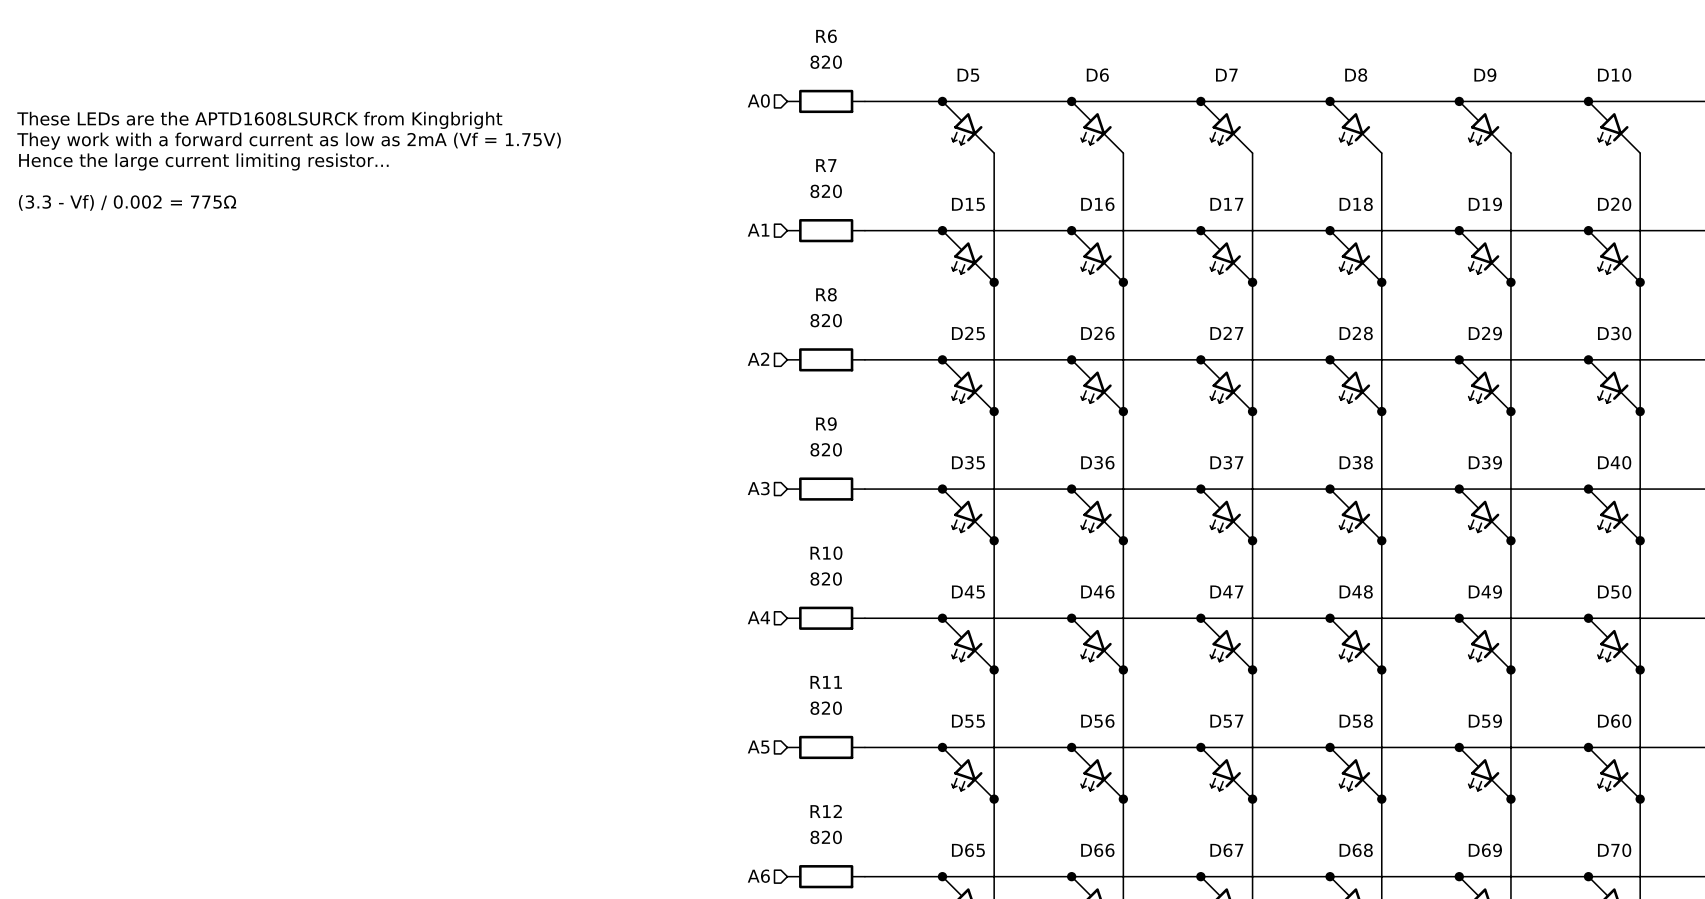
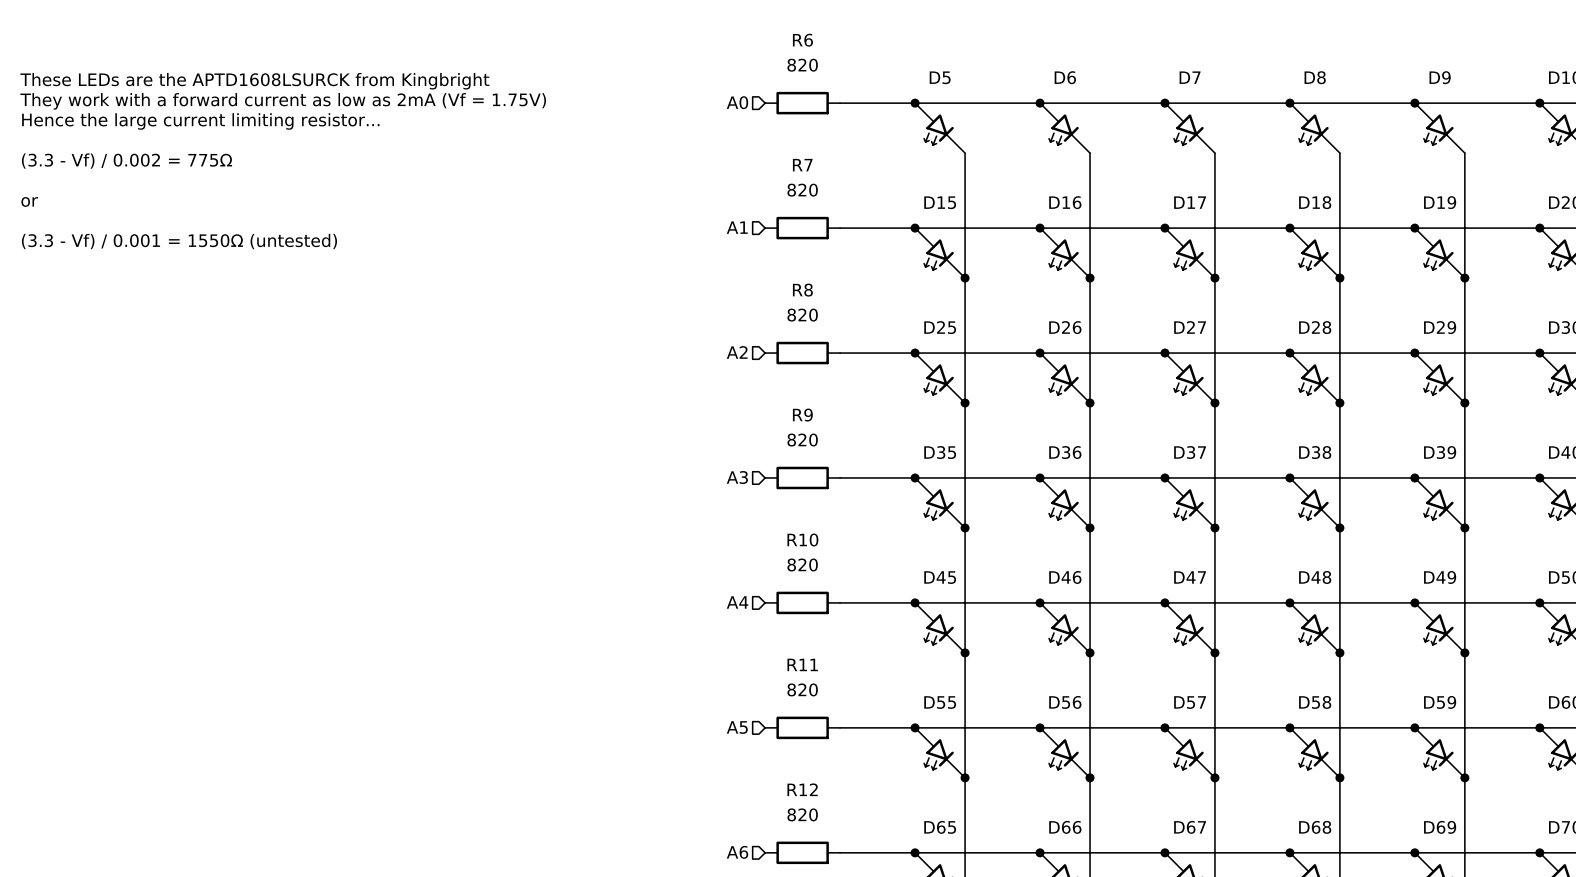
text: none -> These LEDs are the APTD1608LSURCK from Kingbright (254, 81)
text: These LEDs are the APTD1608LSURCK from Kingbright (259, 120) -> Hence the large current limiting resistor... (200, 121)
text position: They work with a forward current as low as 2mA (Vf = 1.75V) (289, 141) -> They work with a forward current as low as 2mA (Vf = 1.75V) (283, 101)
text: Hence the large current limiting resistor... (203, 162) -> (3.3 - Vf) / 0.002 = 775Ω (126, 161)
text: (3.3 - Vf) / 0.002 = 775Ω (127, 202) -> or (29, 201)
text: none -> (3.3 - Vf) / 0.001 = 1550Ω (untested) (179, 241)

